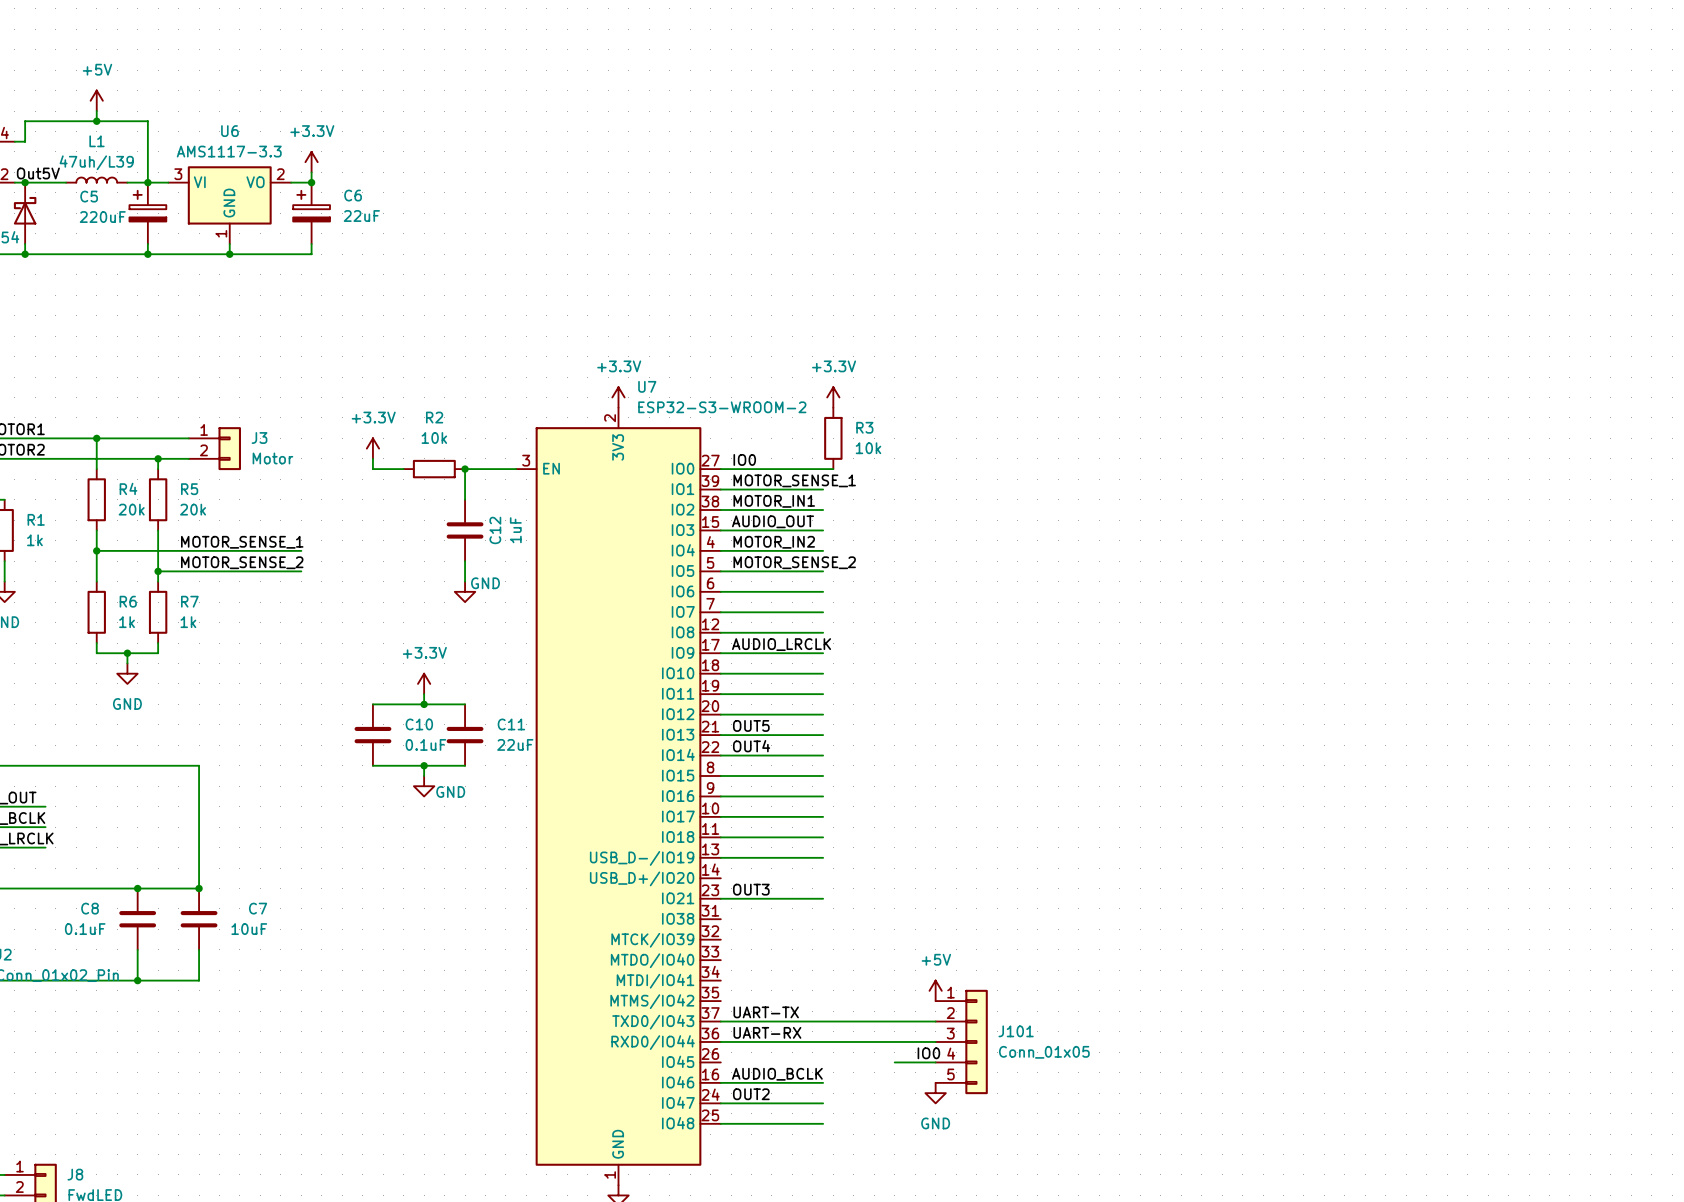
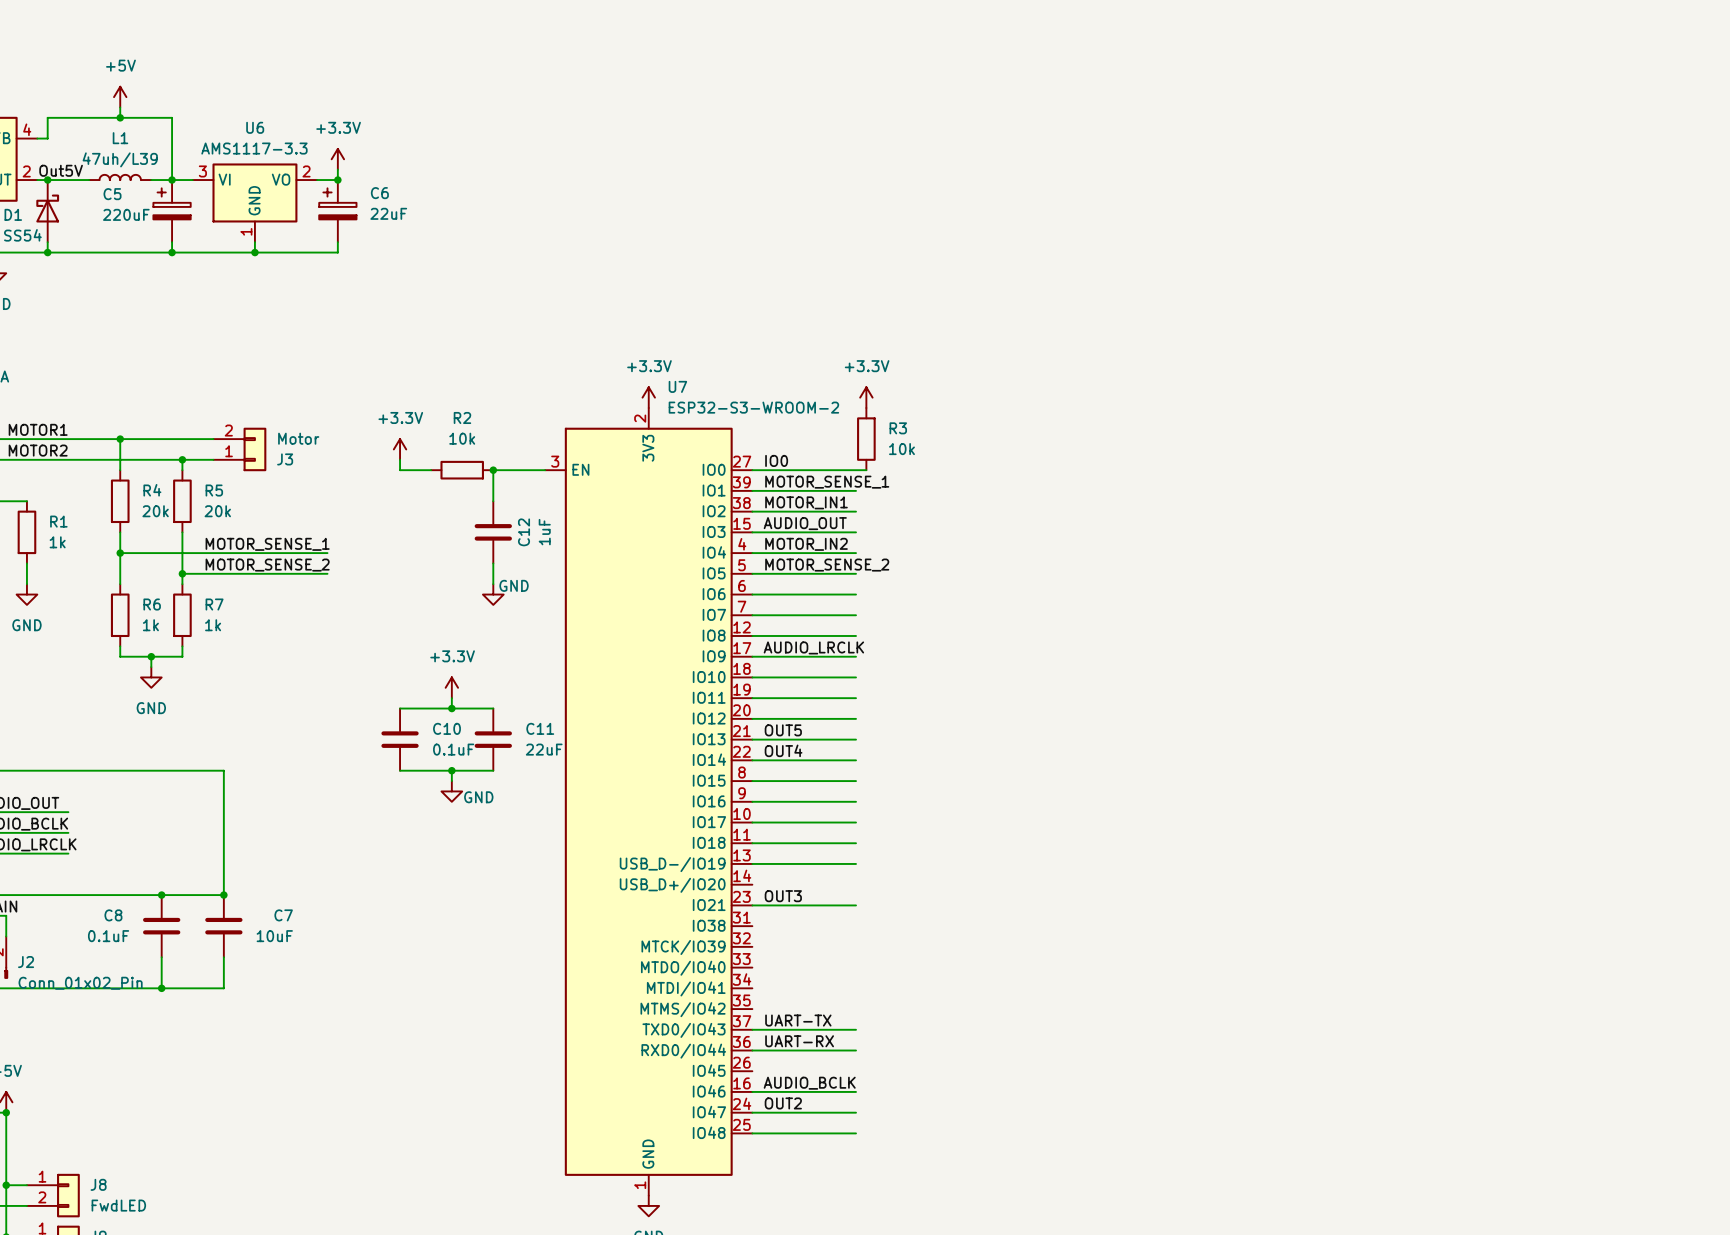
J3 flip: as is (229, 448) -> up-down (254, 449)
power symbol: +5V (935, 990) -> none
wire: (823, 1021) (935, 1021) -> none
wire: (823, 1041) (935, 1041) -> none
J101: Conn_01x05 (961, 1041) -> none
label: IO0 (928, 1053) -> none
wire: (894, 1062) (935, 1062) -> none
power symbol: GND (935, 1093) -> none

